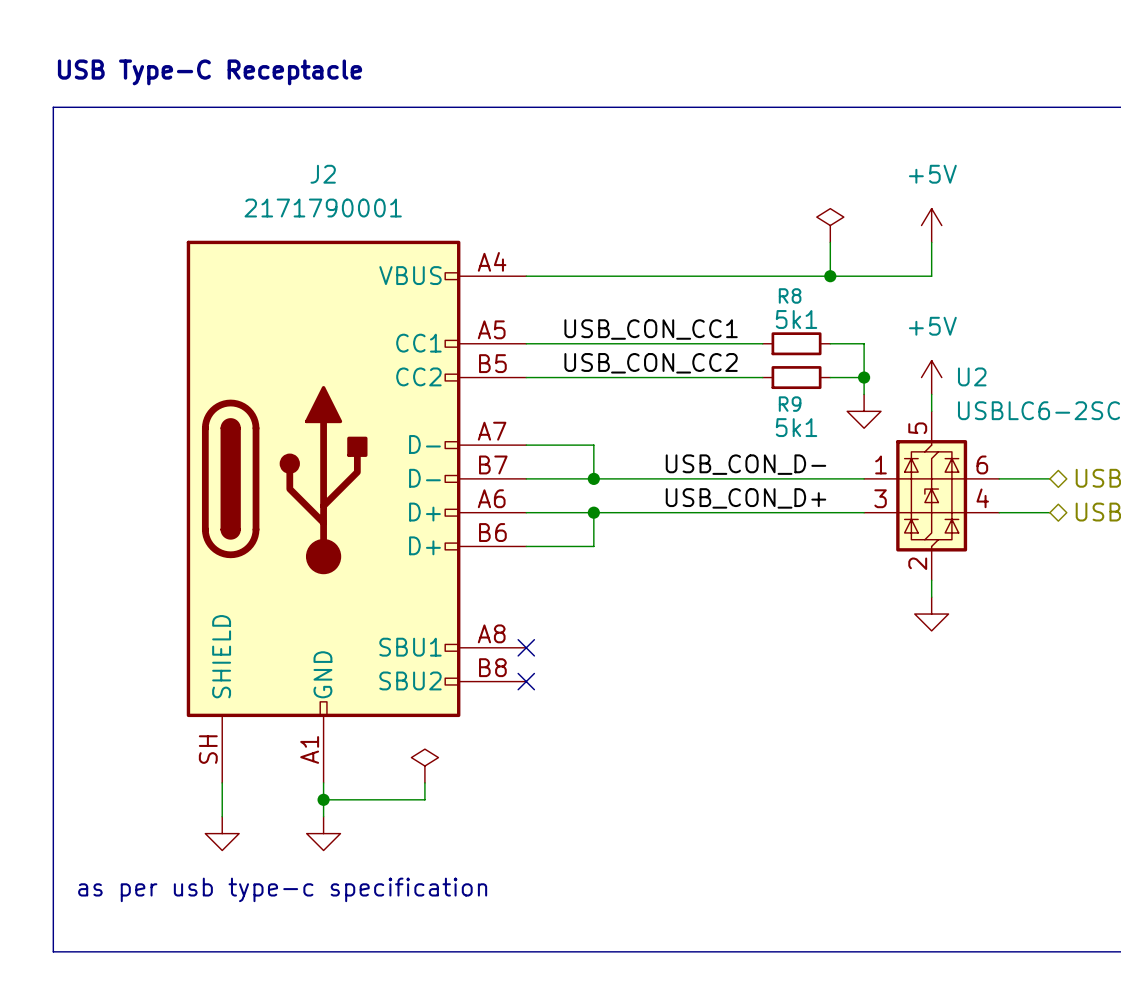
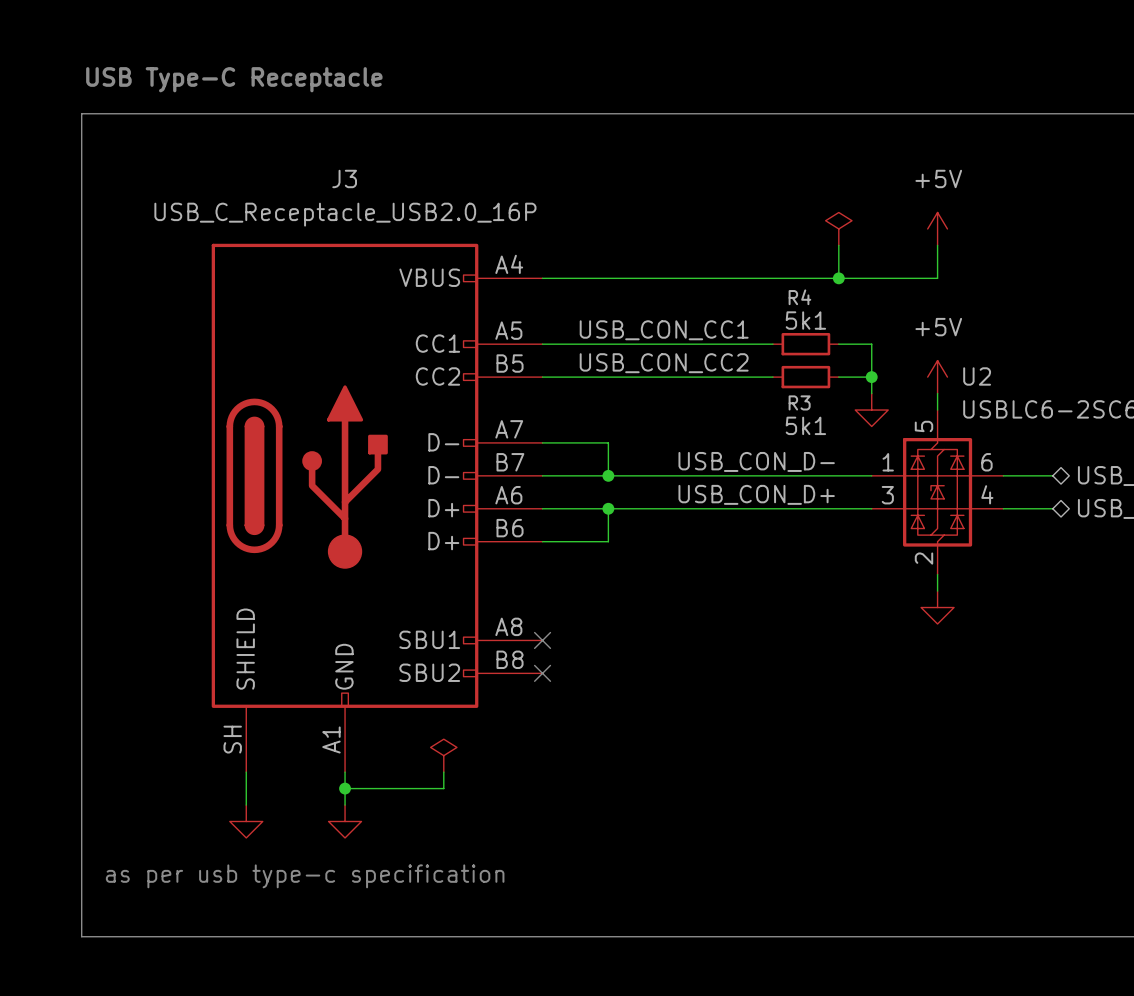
J2 name: J2 (323, 174) -> J3 (344, 178)
J2 value: 2171790001 (323, 208) -> USB_C_Receptacle_USB2.0_16P (345, 214)
R8 name: R8 (790, 295) -> R4 (799, 297)
R9 name: R9 (790, 404) -> R3 (799, 402)

